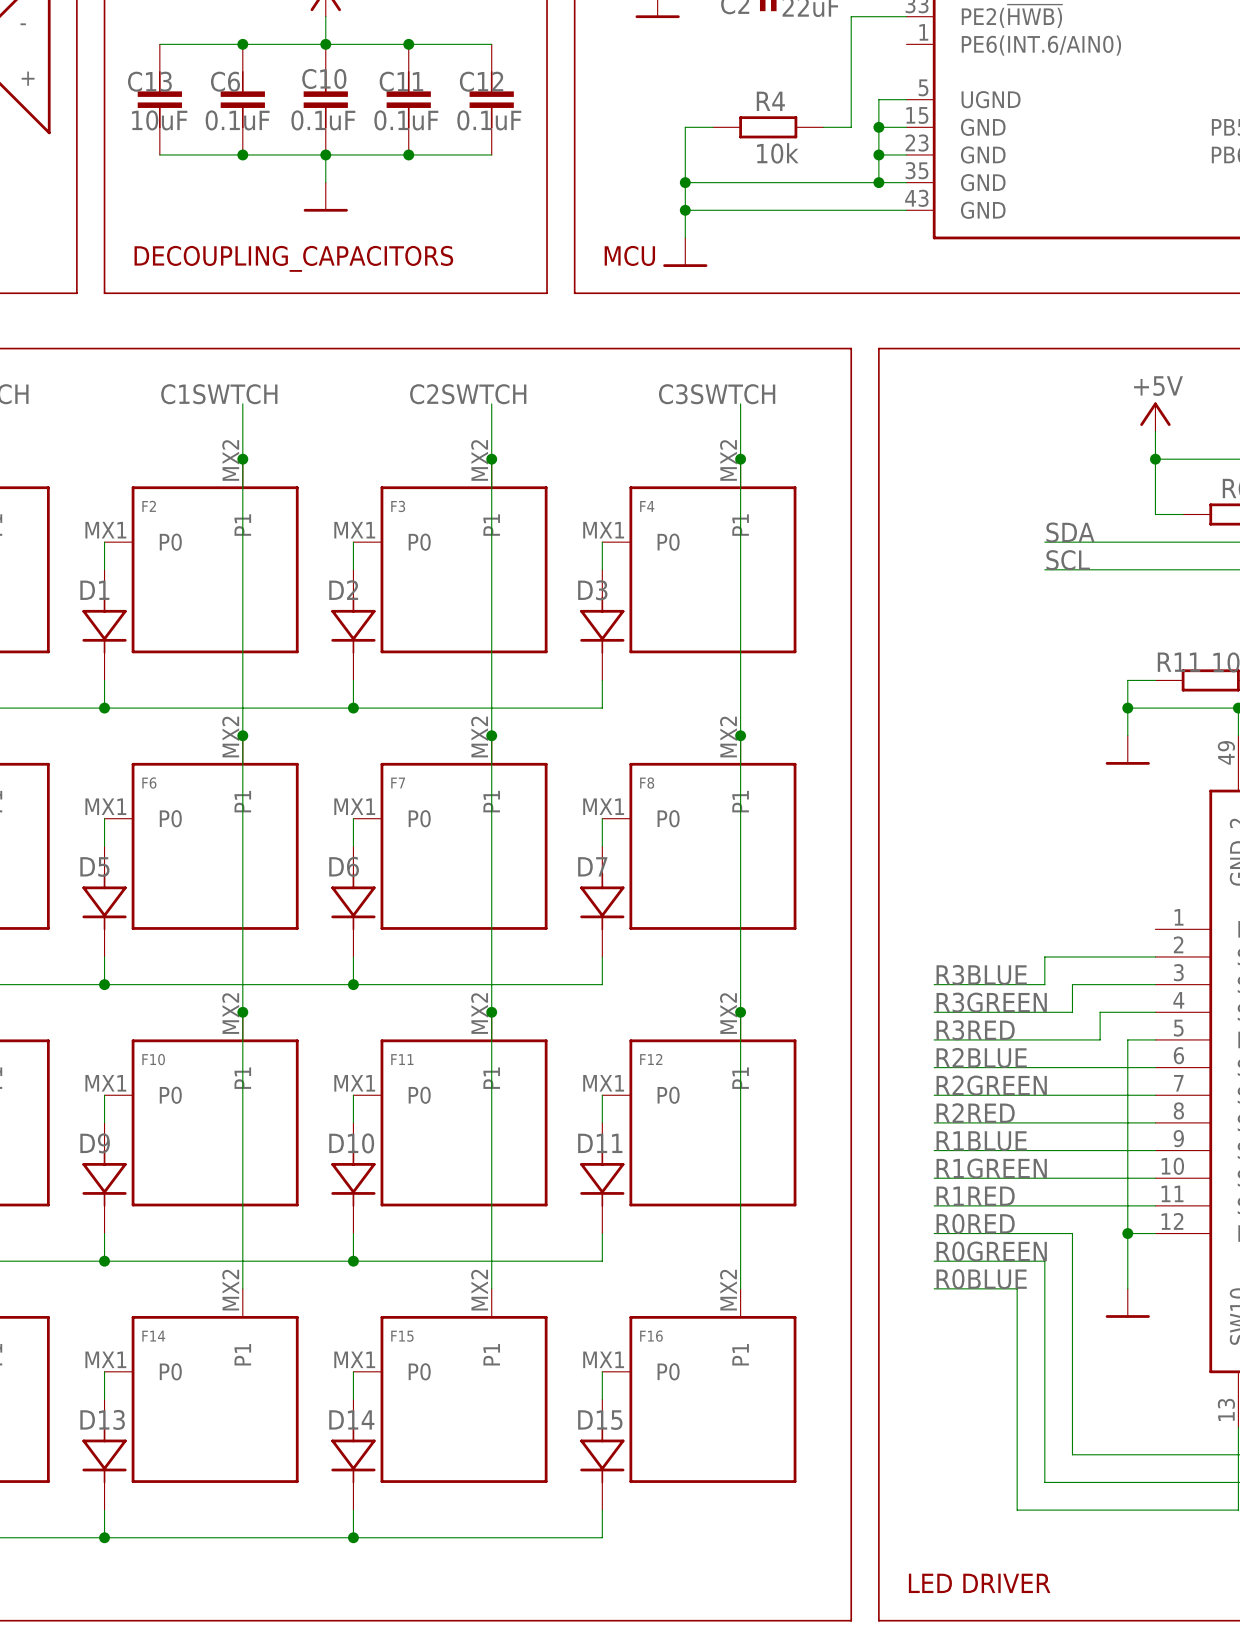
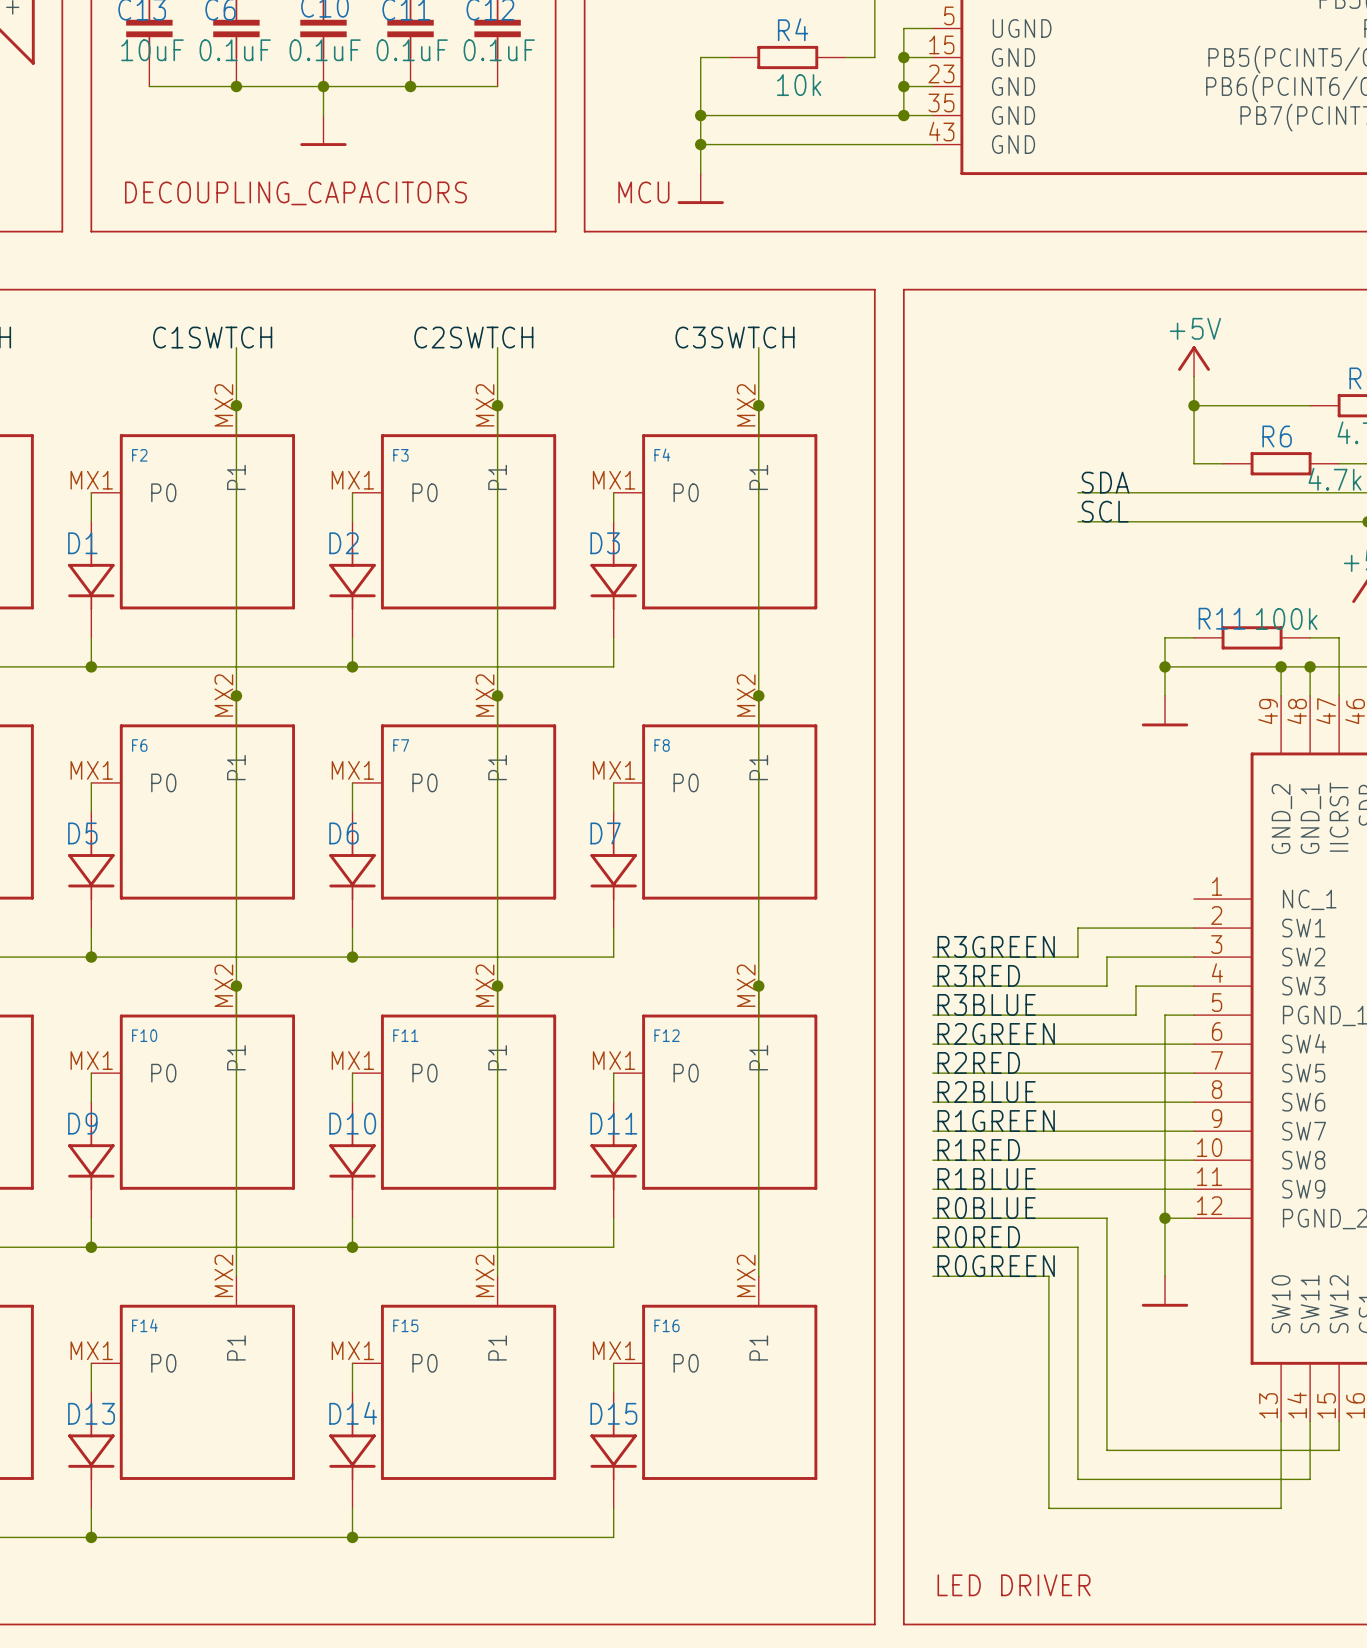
label position: R3BLUE (981, 974) -> R3BLUE (986, 1004)
wire: none -> (932, 957) (961, 957)
label position: R3GREEN (991, 1002) -> R3GREEN (996, 946)
wire: none -> (932, 986) (961, 986)
label position: R3RED (975, 1030) -> R3RED (978, 975)
wire: none -> (932, 1015) (961, 1015)
label position: R2BLUE (981, 1057) -> R2BLUE (986, 1092)
wire: none -> (932, 1044) (961, 1044)
label position: R2GREEN (991, 1085) -> R2GREEN (996, 1033)
wire: none -> (932, 1073) (961, 1073)
label position: R2RED (975, 1113) -> R2RED (978, 1062)
wire: none -> (932, 1102) (961, 1102)
label position: R1BLUE (981, 1141) -> R1BLUE (986, 1179)
wire: none -> (932, 1131) (961, 1131)
label position: R1GREEN (991, 1168) -> R1GREEN (996, 1121)
wire: none -> (932, 1160) (961, 1160)
label position: R1RED (975, 1196) -> R1RED (978, 1150)
wire: none -> (932, 1189) (961, 1189)
label position: R0RED (975, 1223) -> R0RED (978, 1237)
wire: none -> (932, 1218) (961, 1218)
label position: R0GREEN (991, 1251) -> R0GREEN (996, 1266)
wire: none -> (932, 1247) (961, 1247)
label position: R0BLUE (981, 1279) -> R0BLUE (986, 1208)
wire: none -> (932, 1276) (961, 1276)

